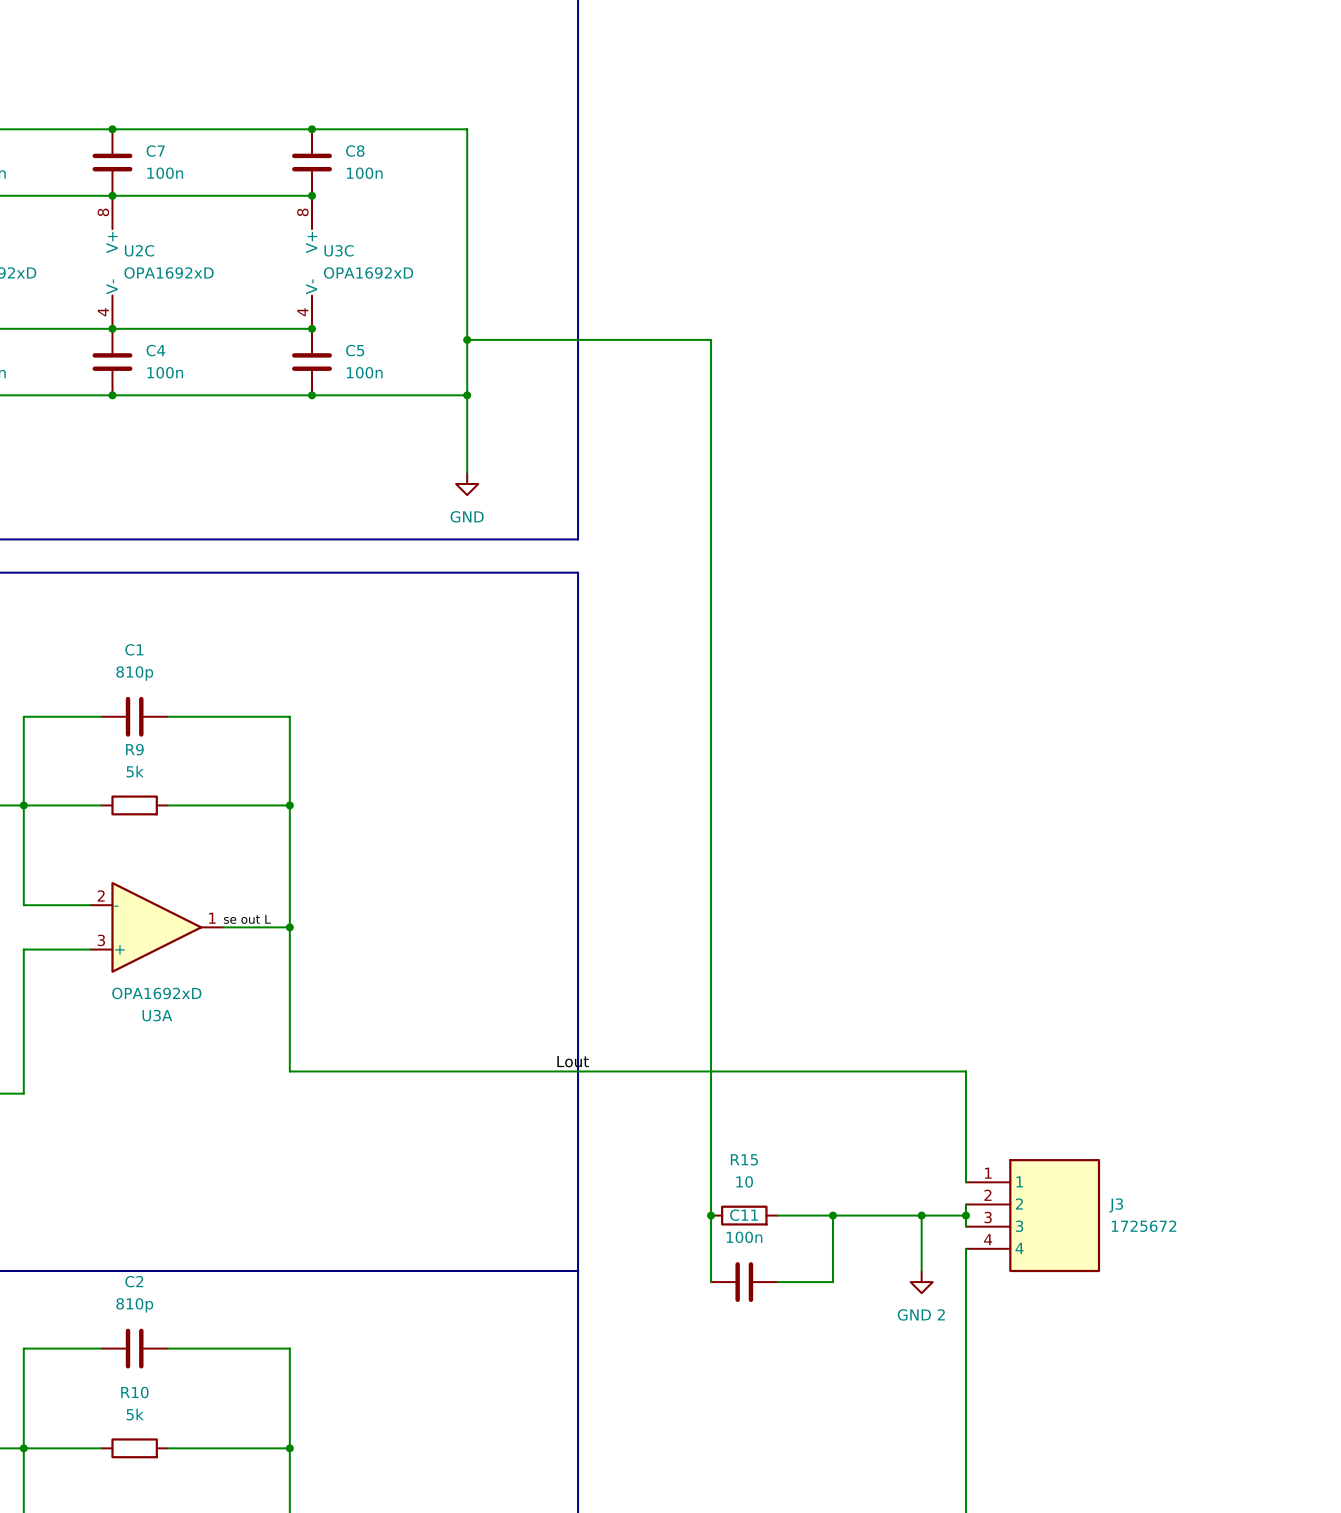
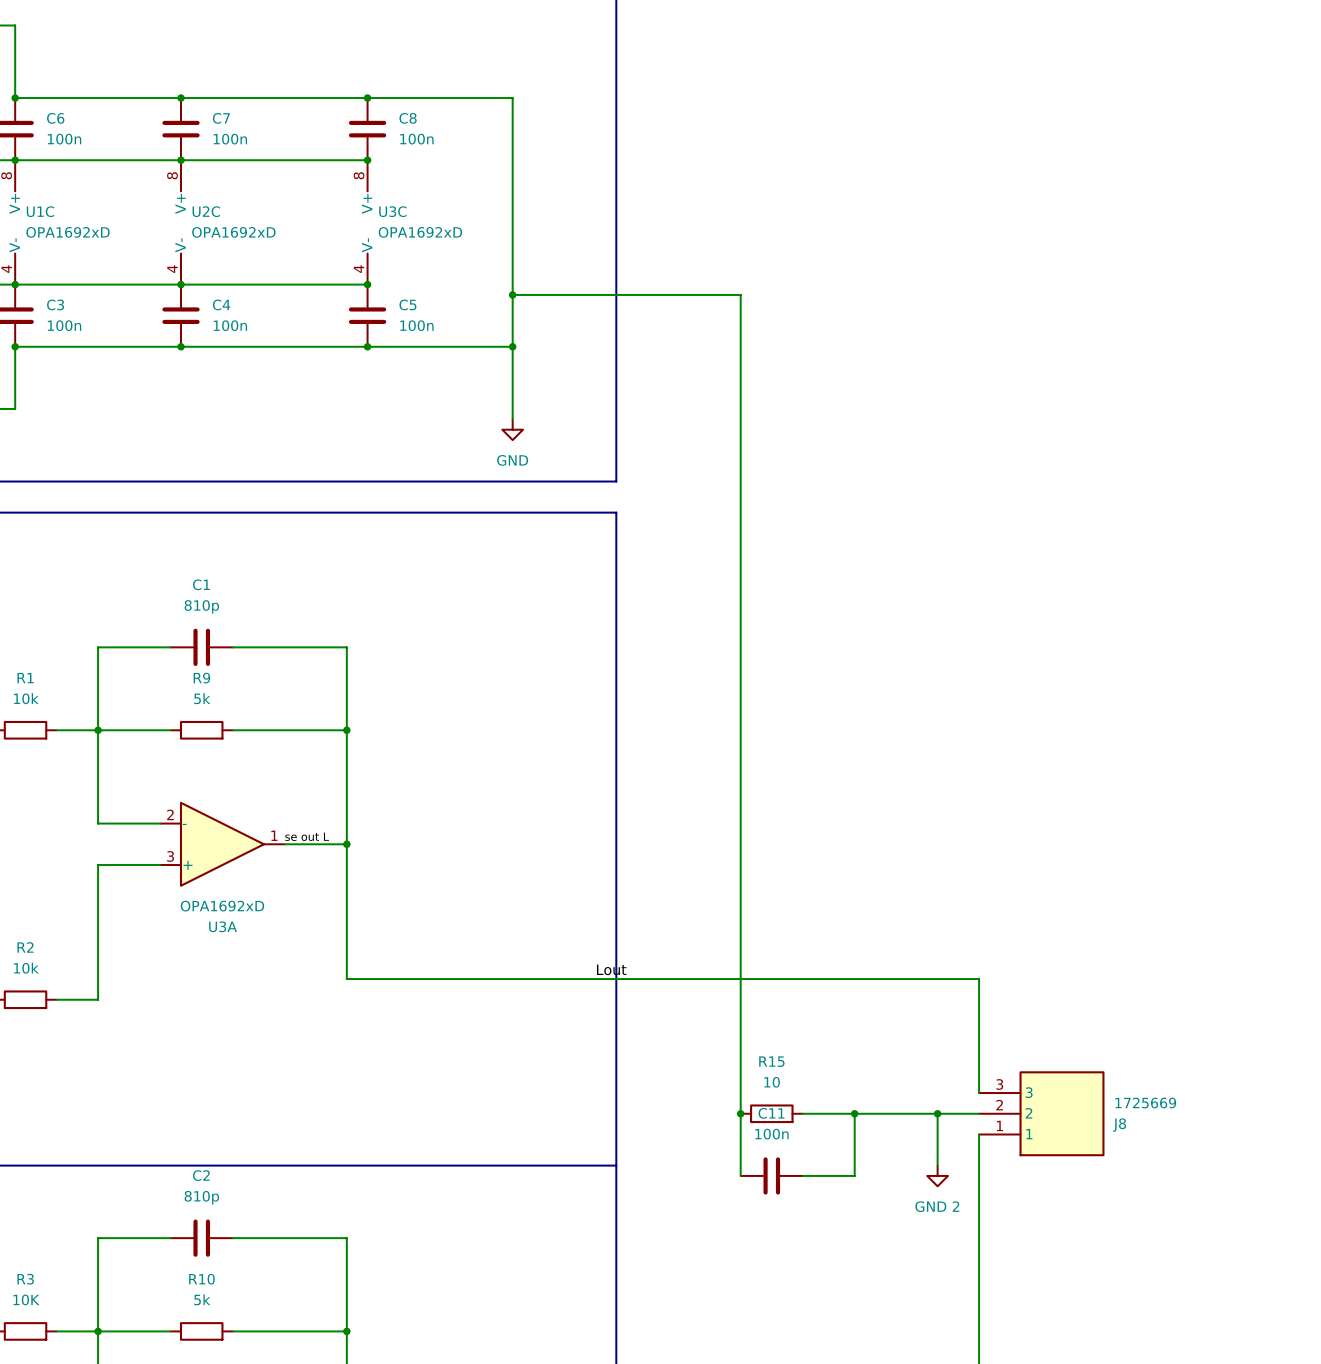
wire: none -> (979, 1082) (979, 1093)
wire: (965, 1204) (965, 1226) -> none
junction: (965, 1215) -> none
J3: 1725672 (1033, 1215) -> none
J8: none -> 1725669 (1041, 1113)
wire: none -> (979, 1134) (979, 1144)

